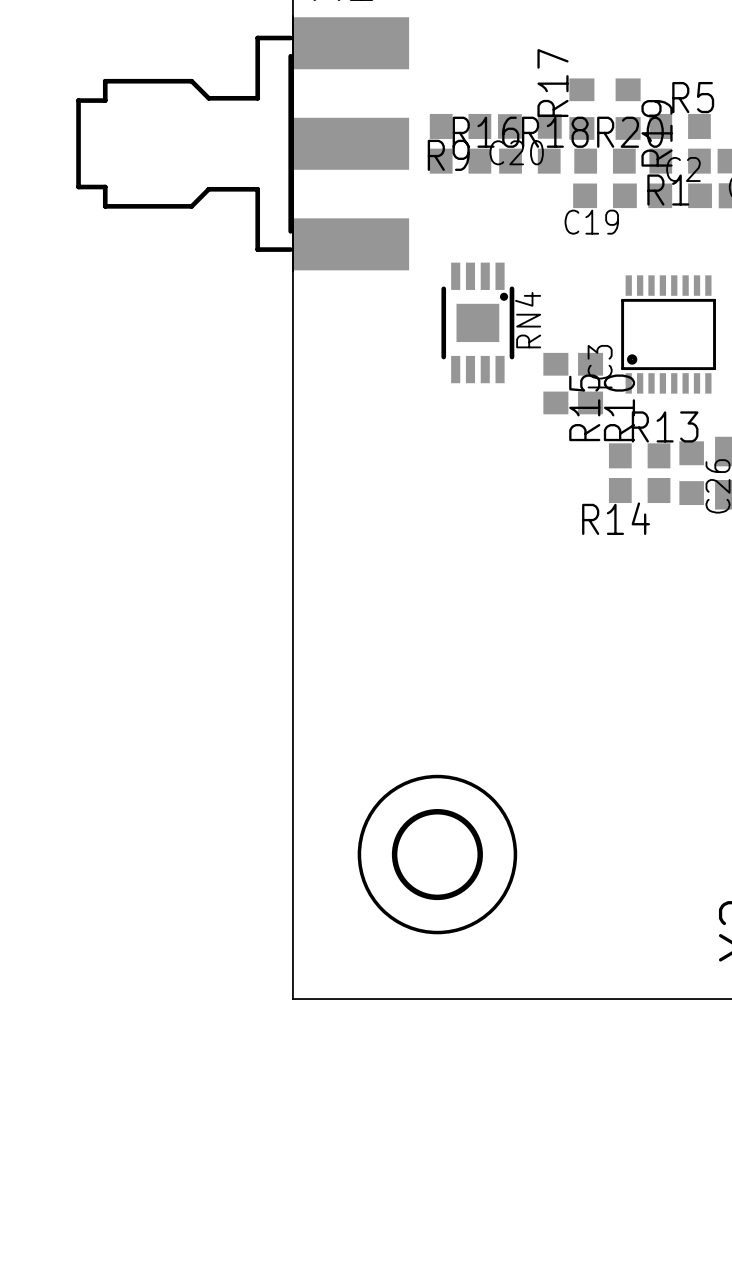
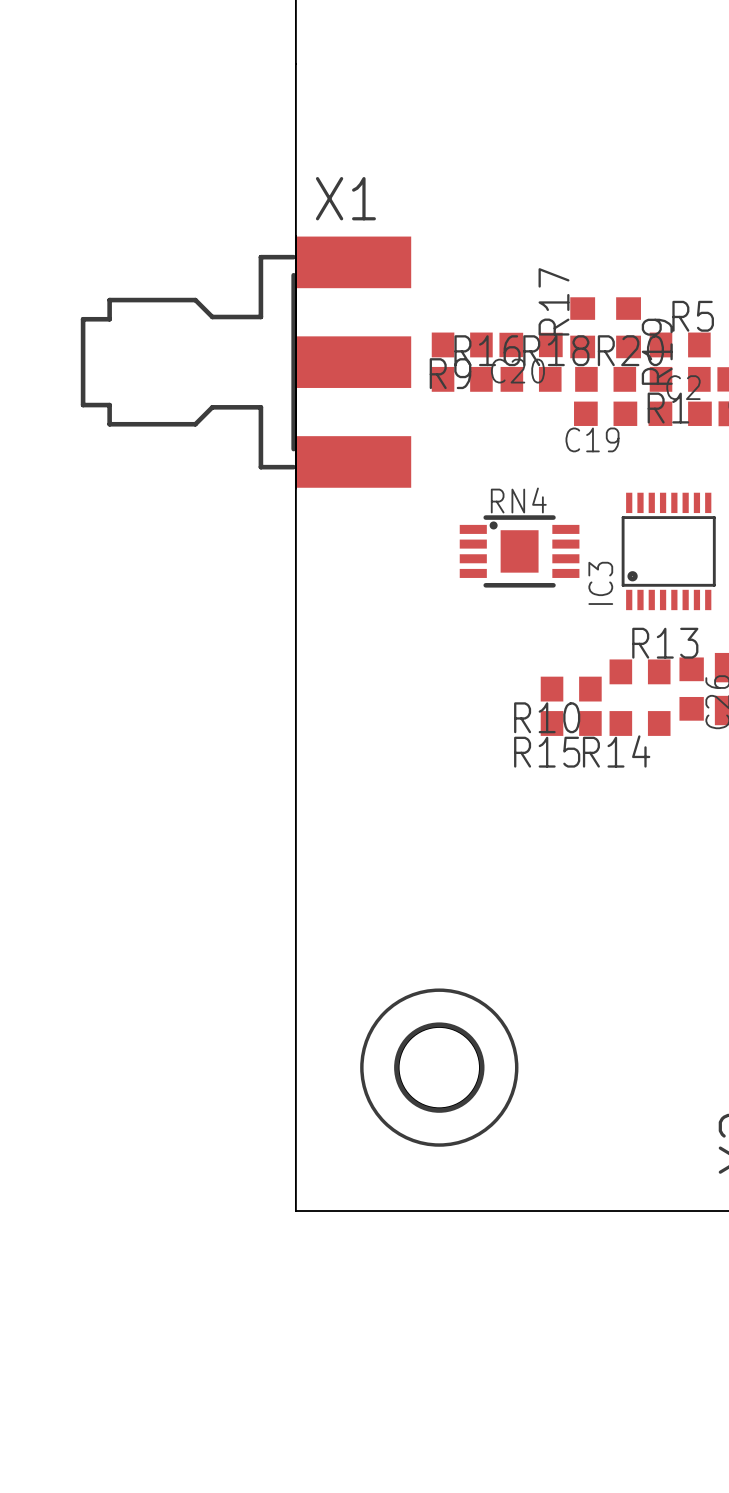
RN4 rotation: 0° (477, 322) -> 90° counterclockwise (519, 551)
R15 rotation: 0° (555, 383) -> 90° clockwise (571, 723)
R15 position: (555, 383) -> (571, 723)
R10 rotation: 0° (590, 383) -> 90° clockwise (571, 689)
R10 position: (590, 383) -> (571, 689)
R14 position: (639, 490) -> (640, 723)

